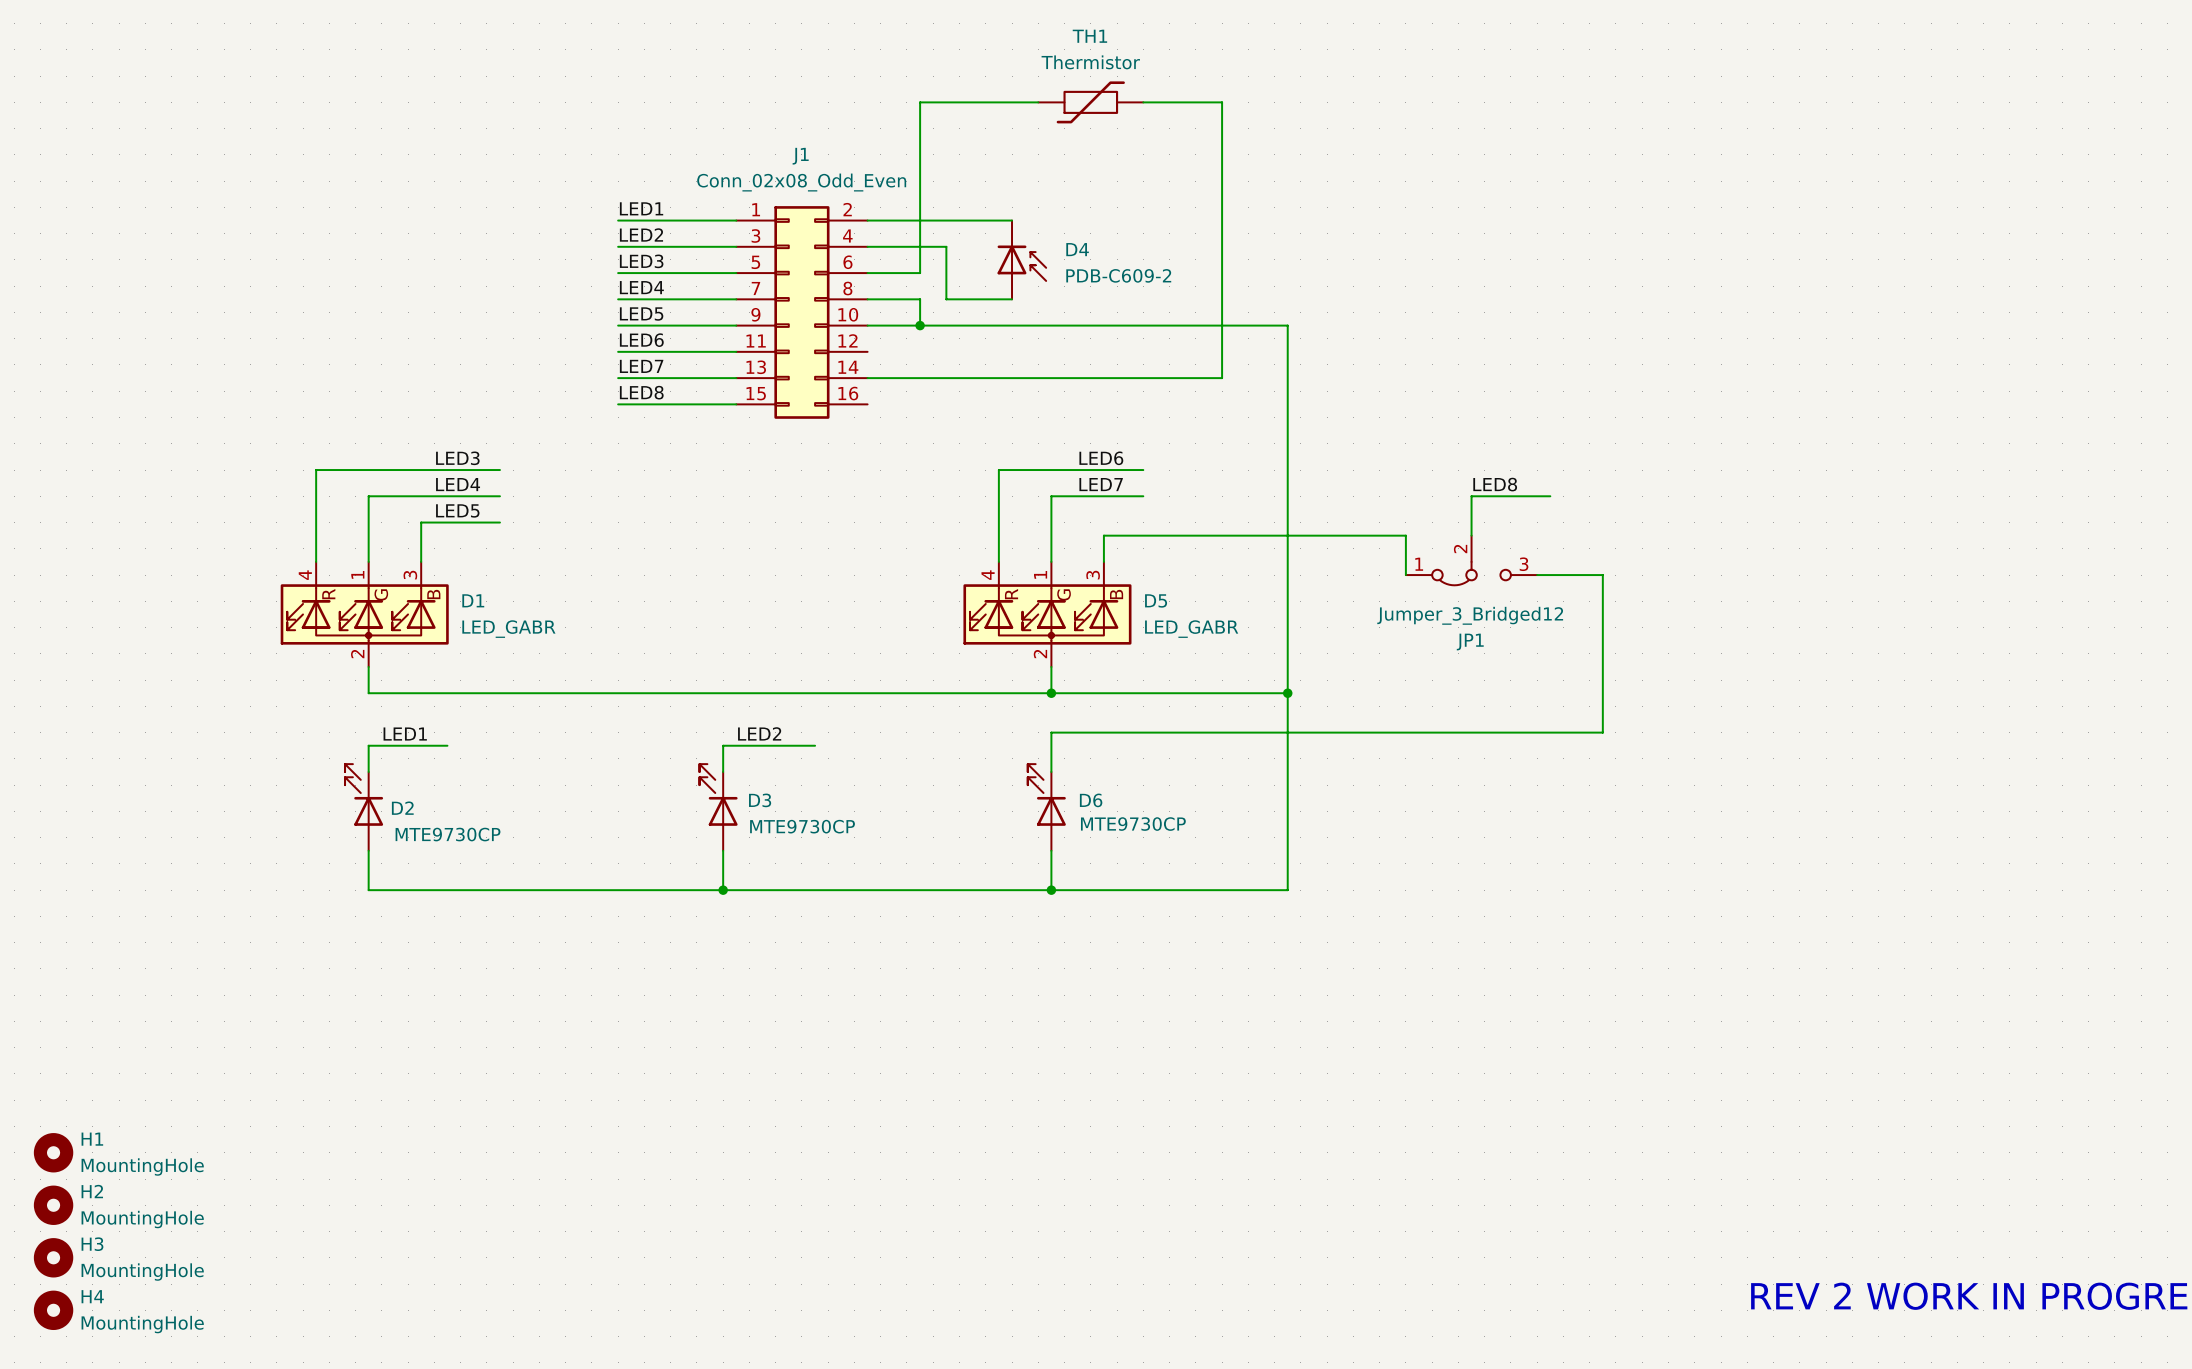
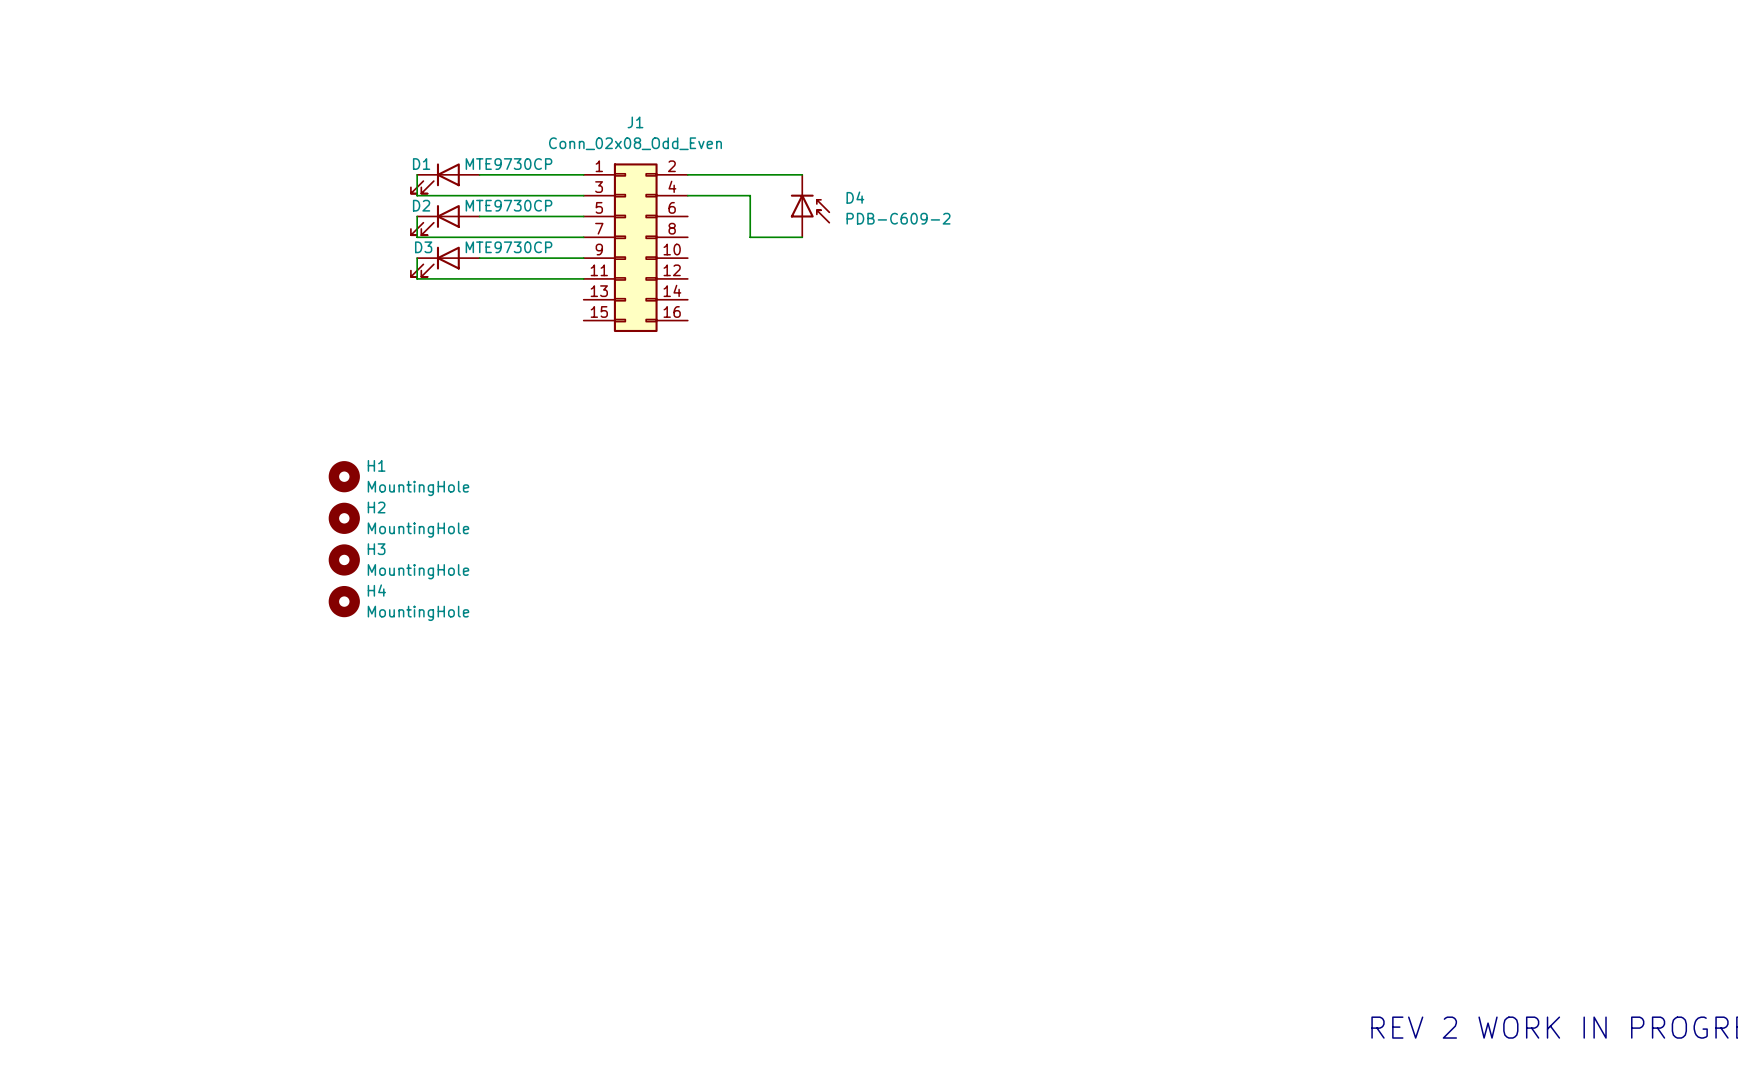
wire: (1038, 102) (920, 102) (920, 273) (867, 273) -> none
TH1: Thermistor (1090, 102) -> none
wire: (1143, 102) (1222, 102) (1222, 378) (867, 378) -> none
label: LED1 (641, 208) -> none
wire: none -> (417, 174) (417, 195) (490, 195)
wire: none -> (479, 174) (490, 174)
label: LED2 (641, 234) -> none
label: LED3 (641, 261) -> none
wire: none -> (417, 216) (417, 237) (490, 237)
wire: none -> (479, 216) (490, 216)
label: LED4 (641, 287) -> none
wire: (867, 299) (920, 299) (920, 325) -> none
label: LED5 (641, 314) -> none
wire: none -> (417, 258) (417, 278) (490, 278)
wire: none -> (479, 258) (490, 258)
wire: (867, 325) (1287, 325) (1287, 890) (368, 890) (368, 850) -> none
junction: (920, 325) -> none
label: LED6 (641, 340) -> none
label: LED7 (641, 366) -> none
wire: (618, 378) (736, 378) -> none
label: LED8 (641, 392) -> none
wire: (618, 404) (736, 404) -> none
label: LED3 (457, 458) -> none
label: LED6 (1101, 458) -> none
wire: (499, 470) (316, 470) (316, 561) -> none
wire: (1143, 470) (998, 470) (998, 561) -> none
label: LED4 (458, 484) -> none
label: LED7 (1101, 484) -> none
label: LED8 (1495, 484) -> none
wire: (499, 496) (368, 496) (368, 561) -> none
wire: (1143, 496) (1051, 496) (1051, 561) -> none
wire: (1550, 496) (1471, 496) (1471, 535) -> none
label: LED5 (457, 510) -> none
wire: (499, 522) (421, 522) (421, 561) -> none
JP1: Jumper_3_Bridged12 (1471, 560) -> none
D1 symbol: [280, 561, 449, 667] -> [410, 163, 480, 194]
wire: (1103, 561) (1103, 535) (1405, 535) (1405, 575) -> none
wire: (1537, 575) (1602, 575) (1602, 732) (1051, 732) (1051, 772) -> none
D1 name position: D1 (473, 600) -> D1 (421, 164)
D5: LED_GABR (1047, 614) -> none
D1 value: LED_GABR (508, 629) -> MTE9730CP (509, 164)
wire: (368, 666) (368, 693) (1287, 693) -> none
wire: (1051, 666) (1051, 693) -> none
junction: (1051, 693) -> none
junction: (1287, 693) -> none
label: LED2 (759, 733) -> none
label: LED1 (405, 734) -> none
wire: (447, 745) (368, 745) (368, 772) -> none
wire: (815, 745) (723, 745) (723, 772) -> none
D2 rotation: 0° (364, 794) -> 90° counterclockwise (435, 220)
D3 rotation: 0° (718, 794) -> 90° counterclockwise (435, 261)
D3 name position: D3 (760, 800) -> D3 (423, 247)
D2 position: (364, 807) -> (445, 220)
D3 position: (718, 807) -> (445, 261)
D6: MTE9730CP (1046, 807) -> none
D2 name position: D2 (402, 808) -> D2 (421, 205)
D3 value position: MTE9730CP (802, 826) -> MTE9730CP (509, 247)
D2 value position: MTE9730CP (448, 834) -> MTE9730CP (509, 205)
wire: (723, 850) (723, 890) -> none
wire: (1051, 850) (1051, 890) -> none
junction: (723, 890) -> none
junction: (1051, 890) -> none
H1 position: (53, 1152) -> (344, 476)
H2 position: (53, 1205) -> (344, 518)
H3 position: (53, 1257) -> (344, 559)
H4 position: (53, 1310) -> (344, 601)

